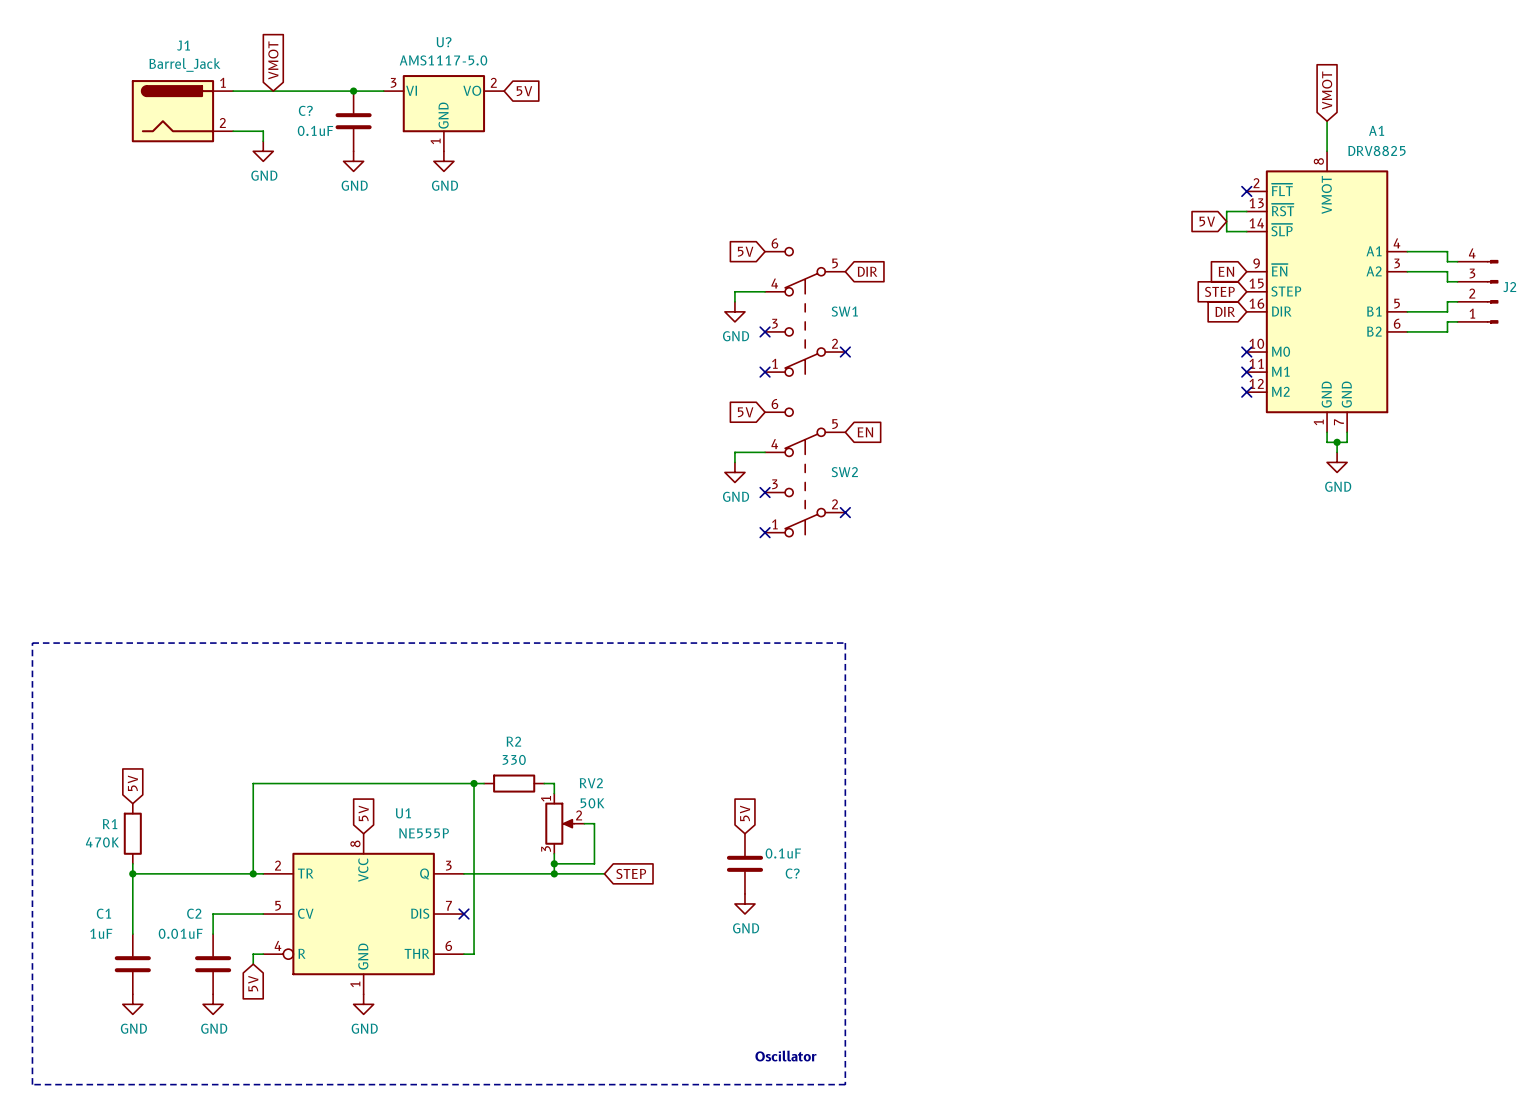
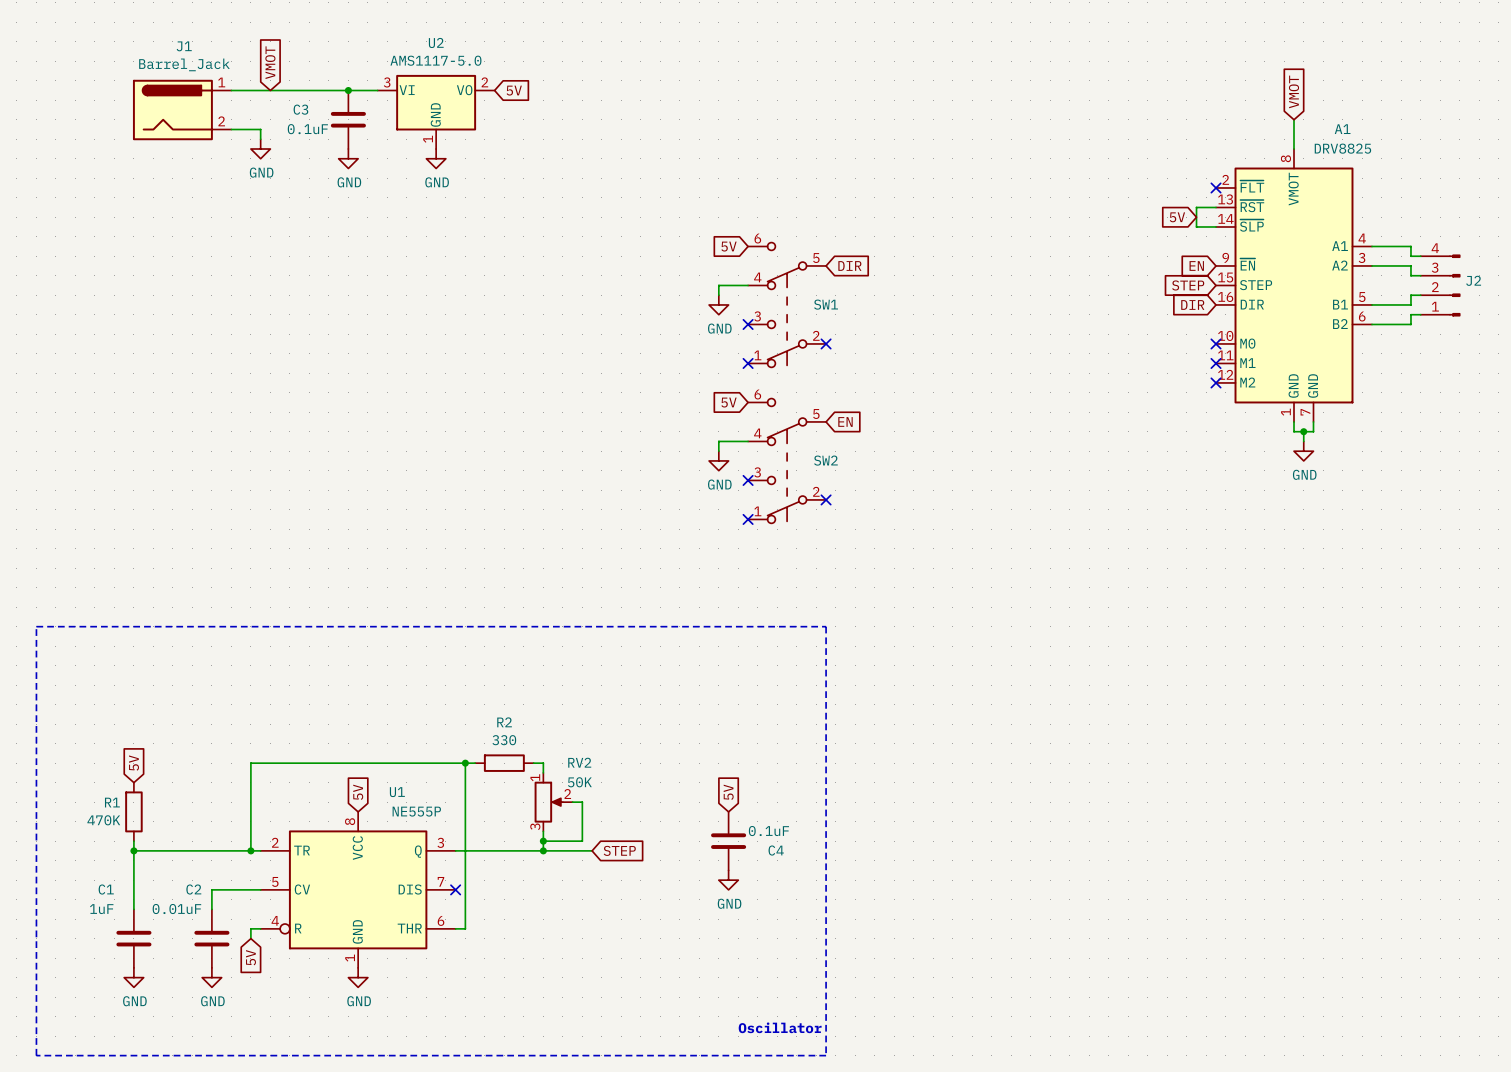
U? name: U? (444, 42) -> U2 (436, 42)
C? name: C? (305, 110) -> C3 (300, 109)
C? name: C? (792, 873) -> C4 (776, 850)

